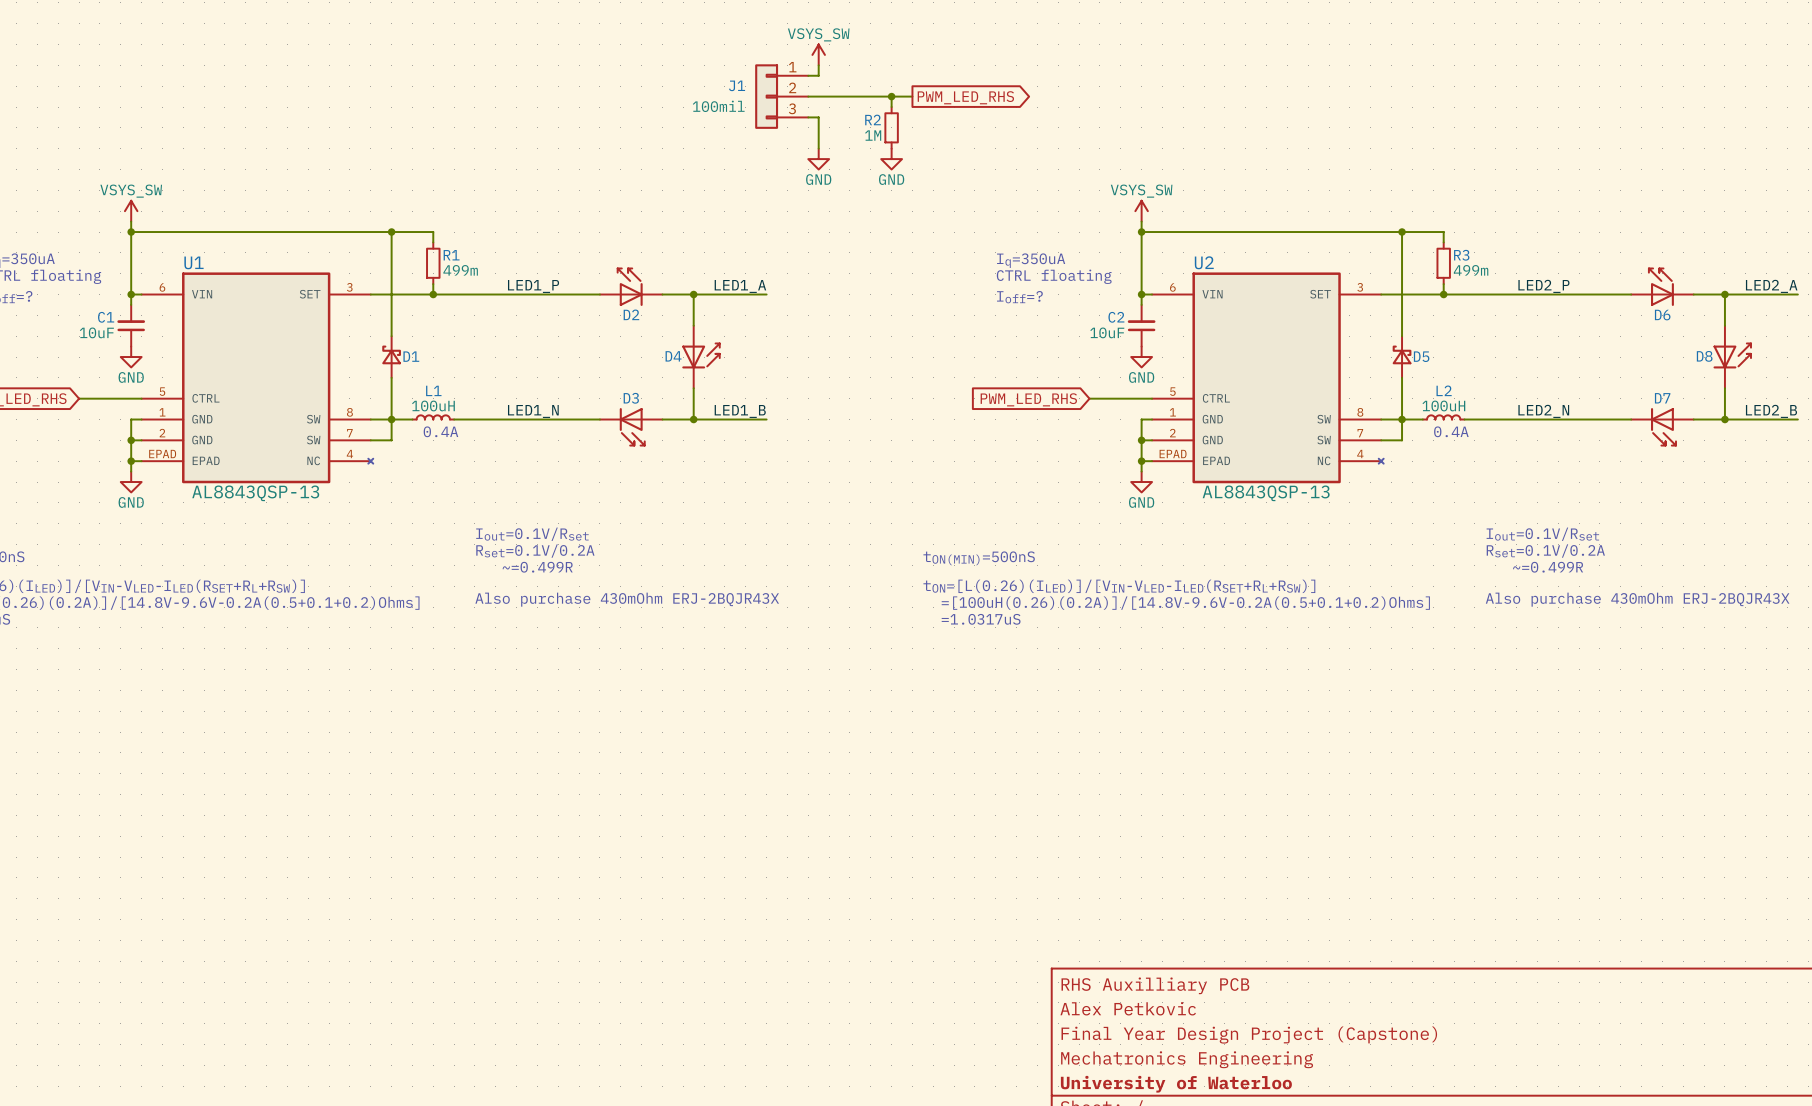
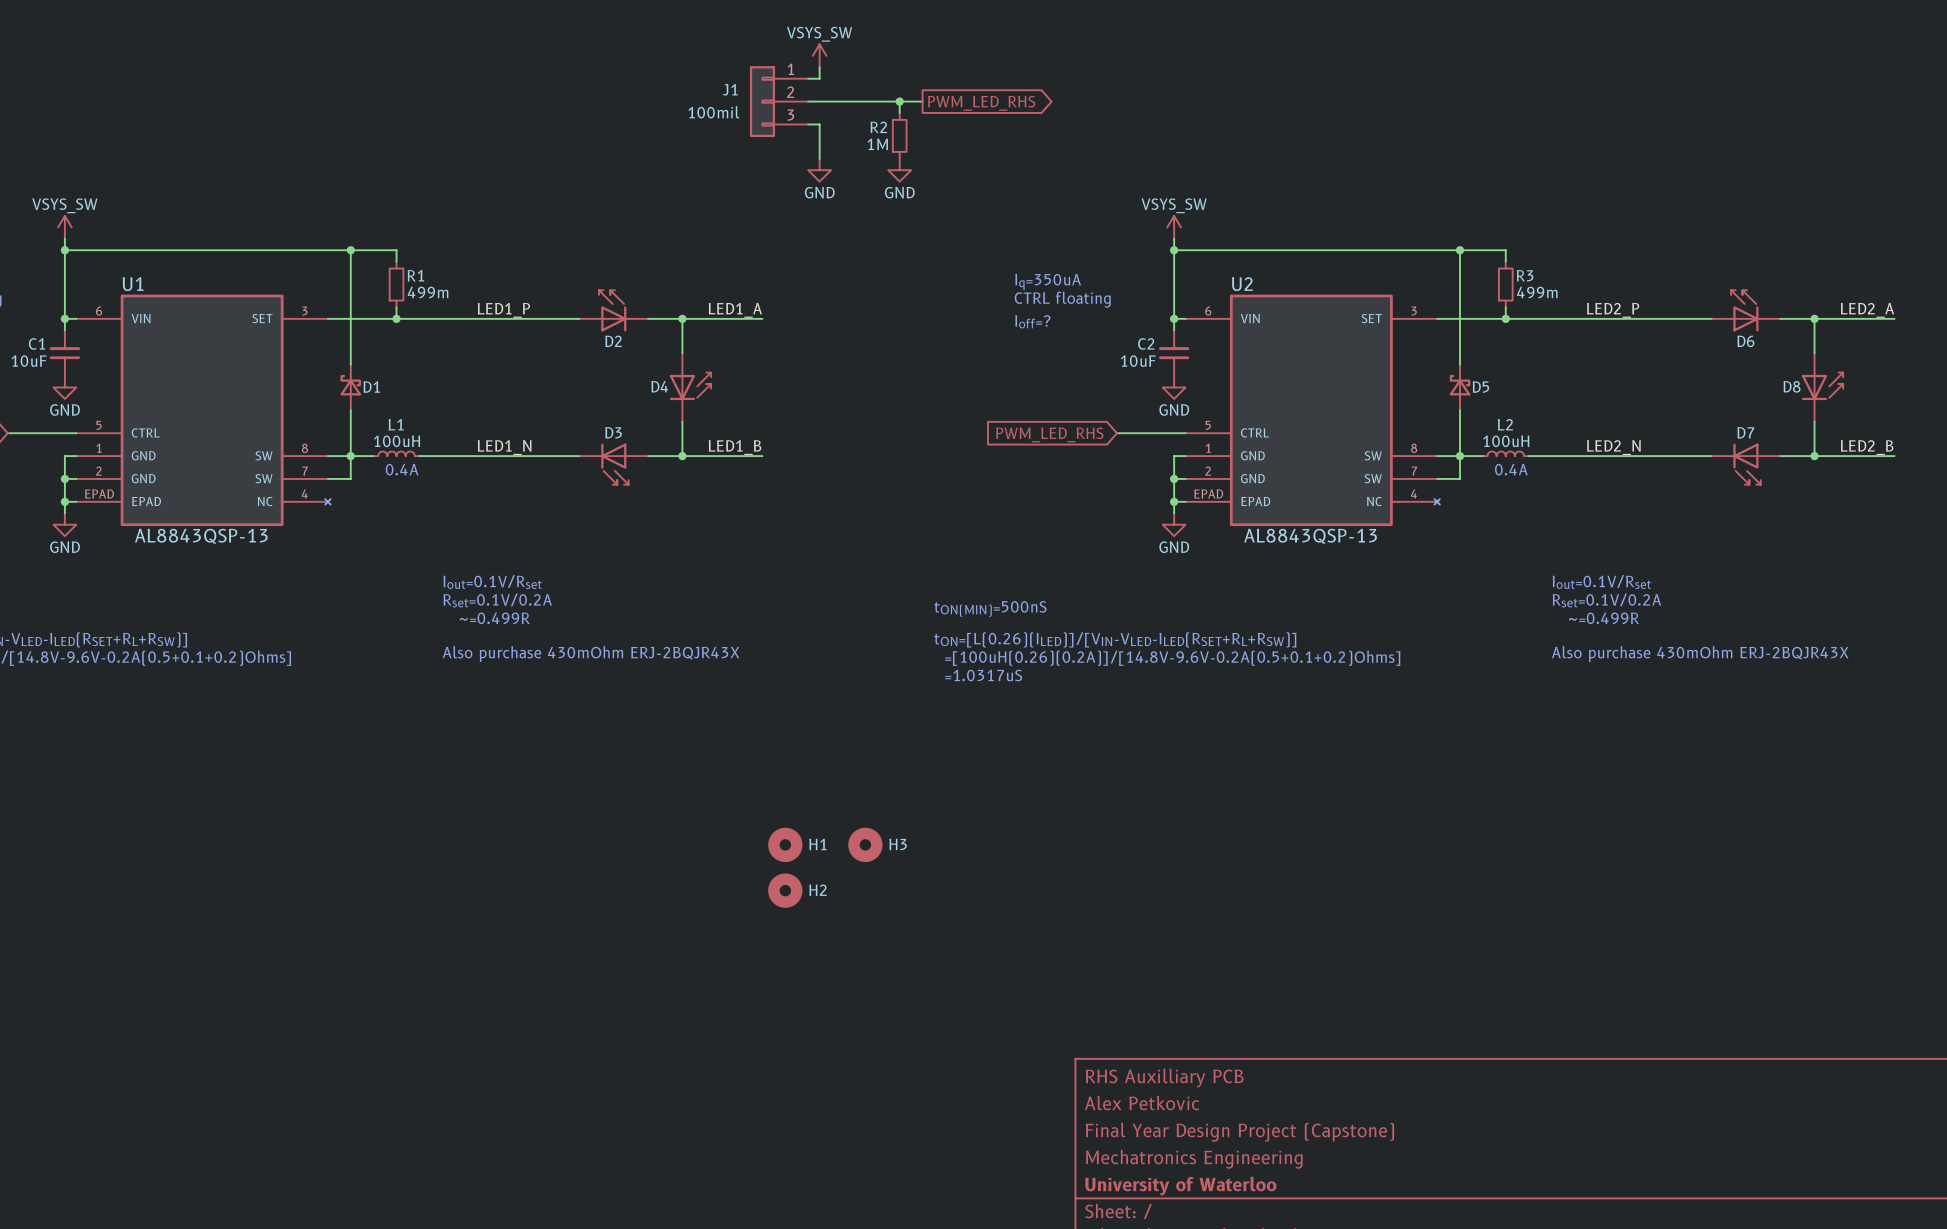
H1: none -> (785, 844)
H3: none -> (865, 844)
H2: none -> (785, 890)

